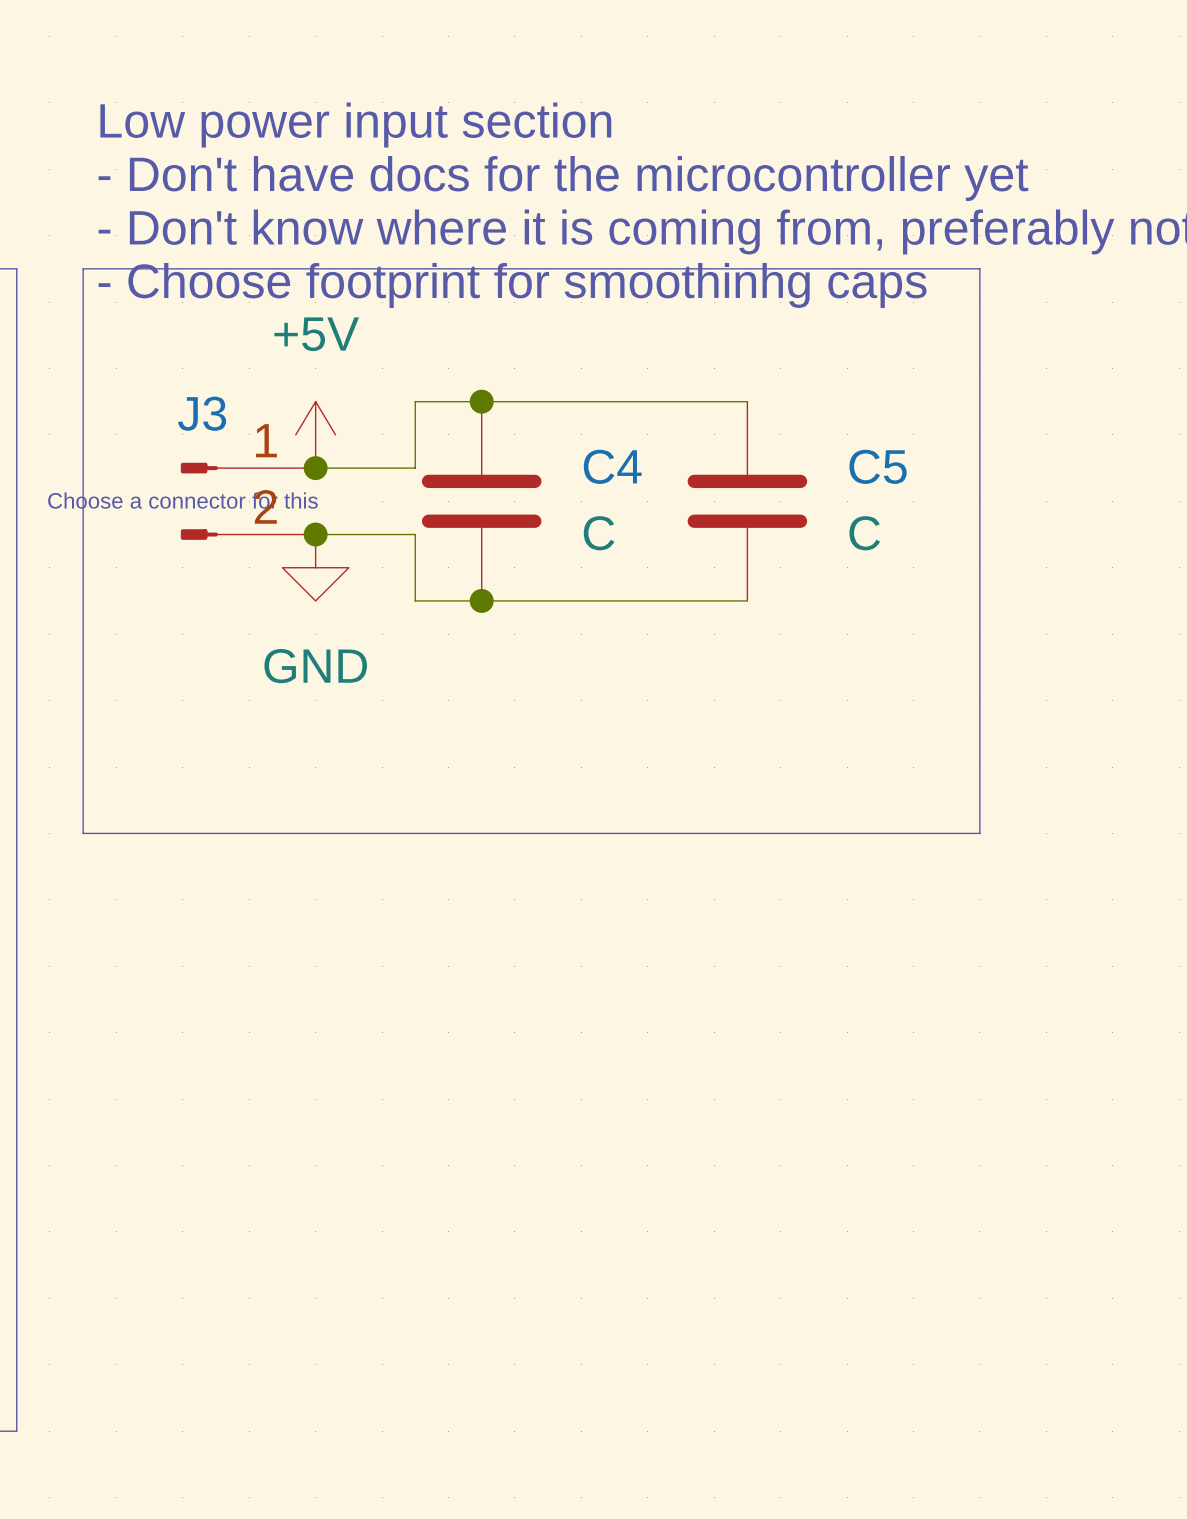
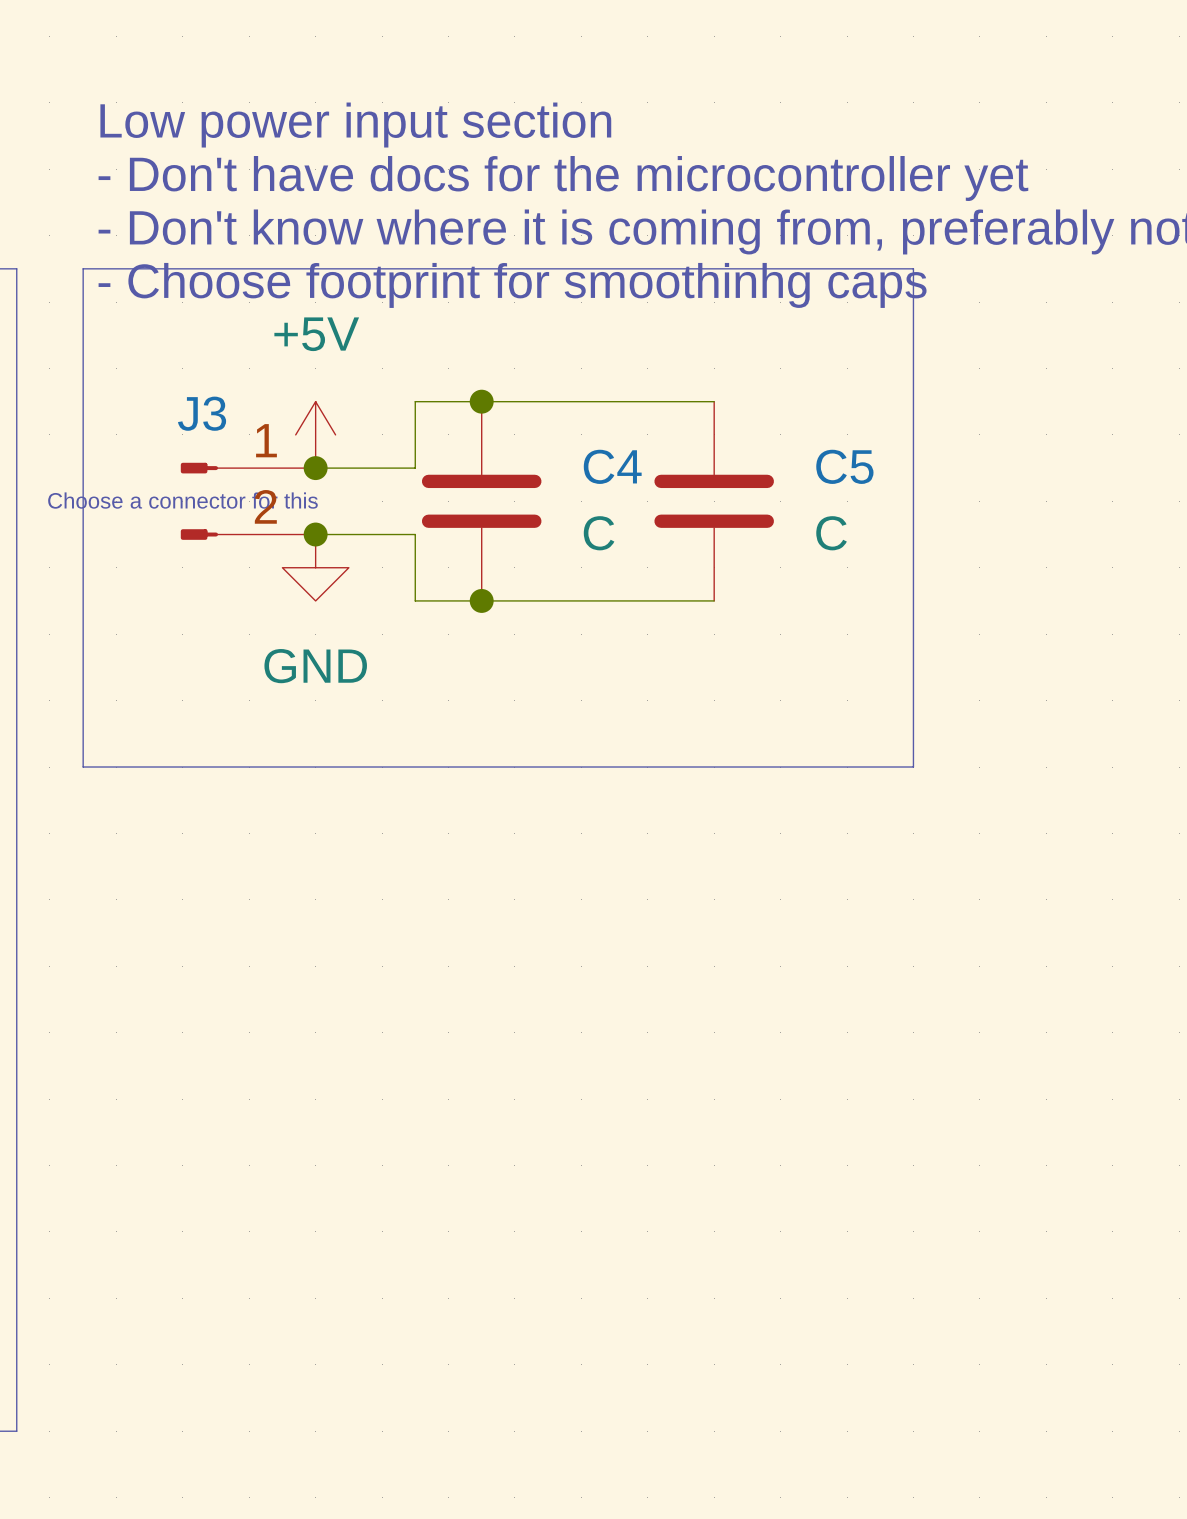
line: (913, 268) (979, 268) (979, 833) (83, 833) (83, 767) -> (913, 268) (913, 767) (83, 767)
wire: (714, 401) (747, 401) -> none
C5 position: (747, 501) -> (714, 501)
wire: (714, 600) (747, 600) -> none

